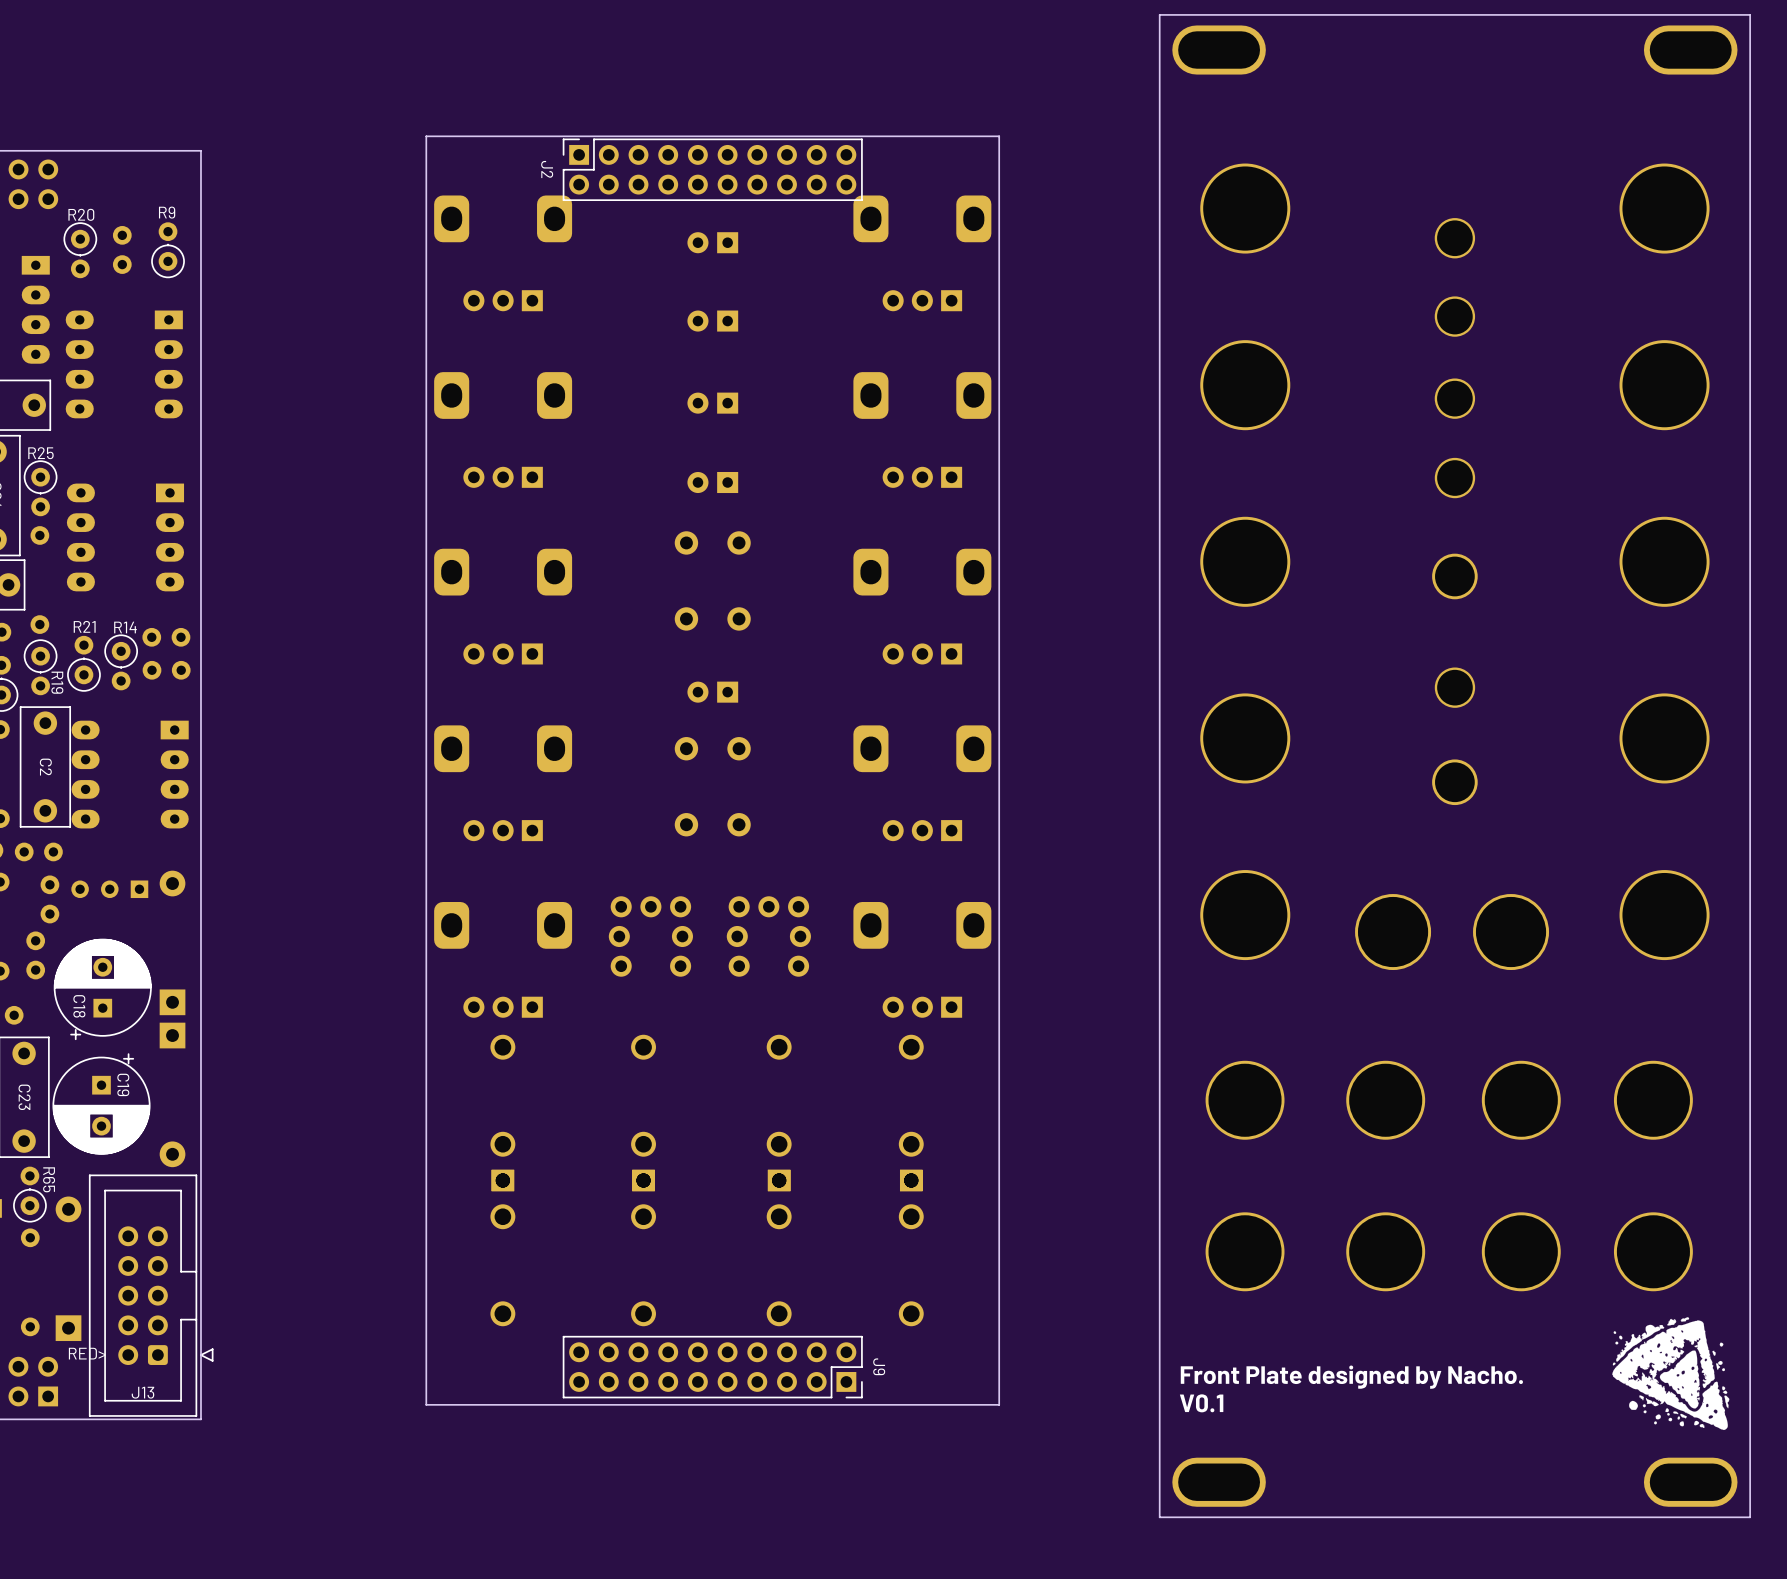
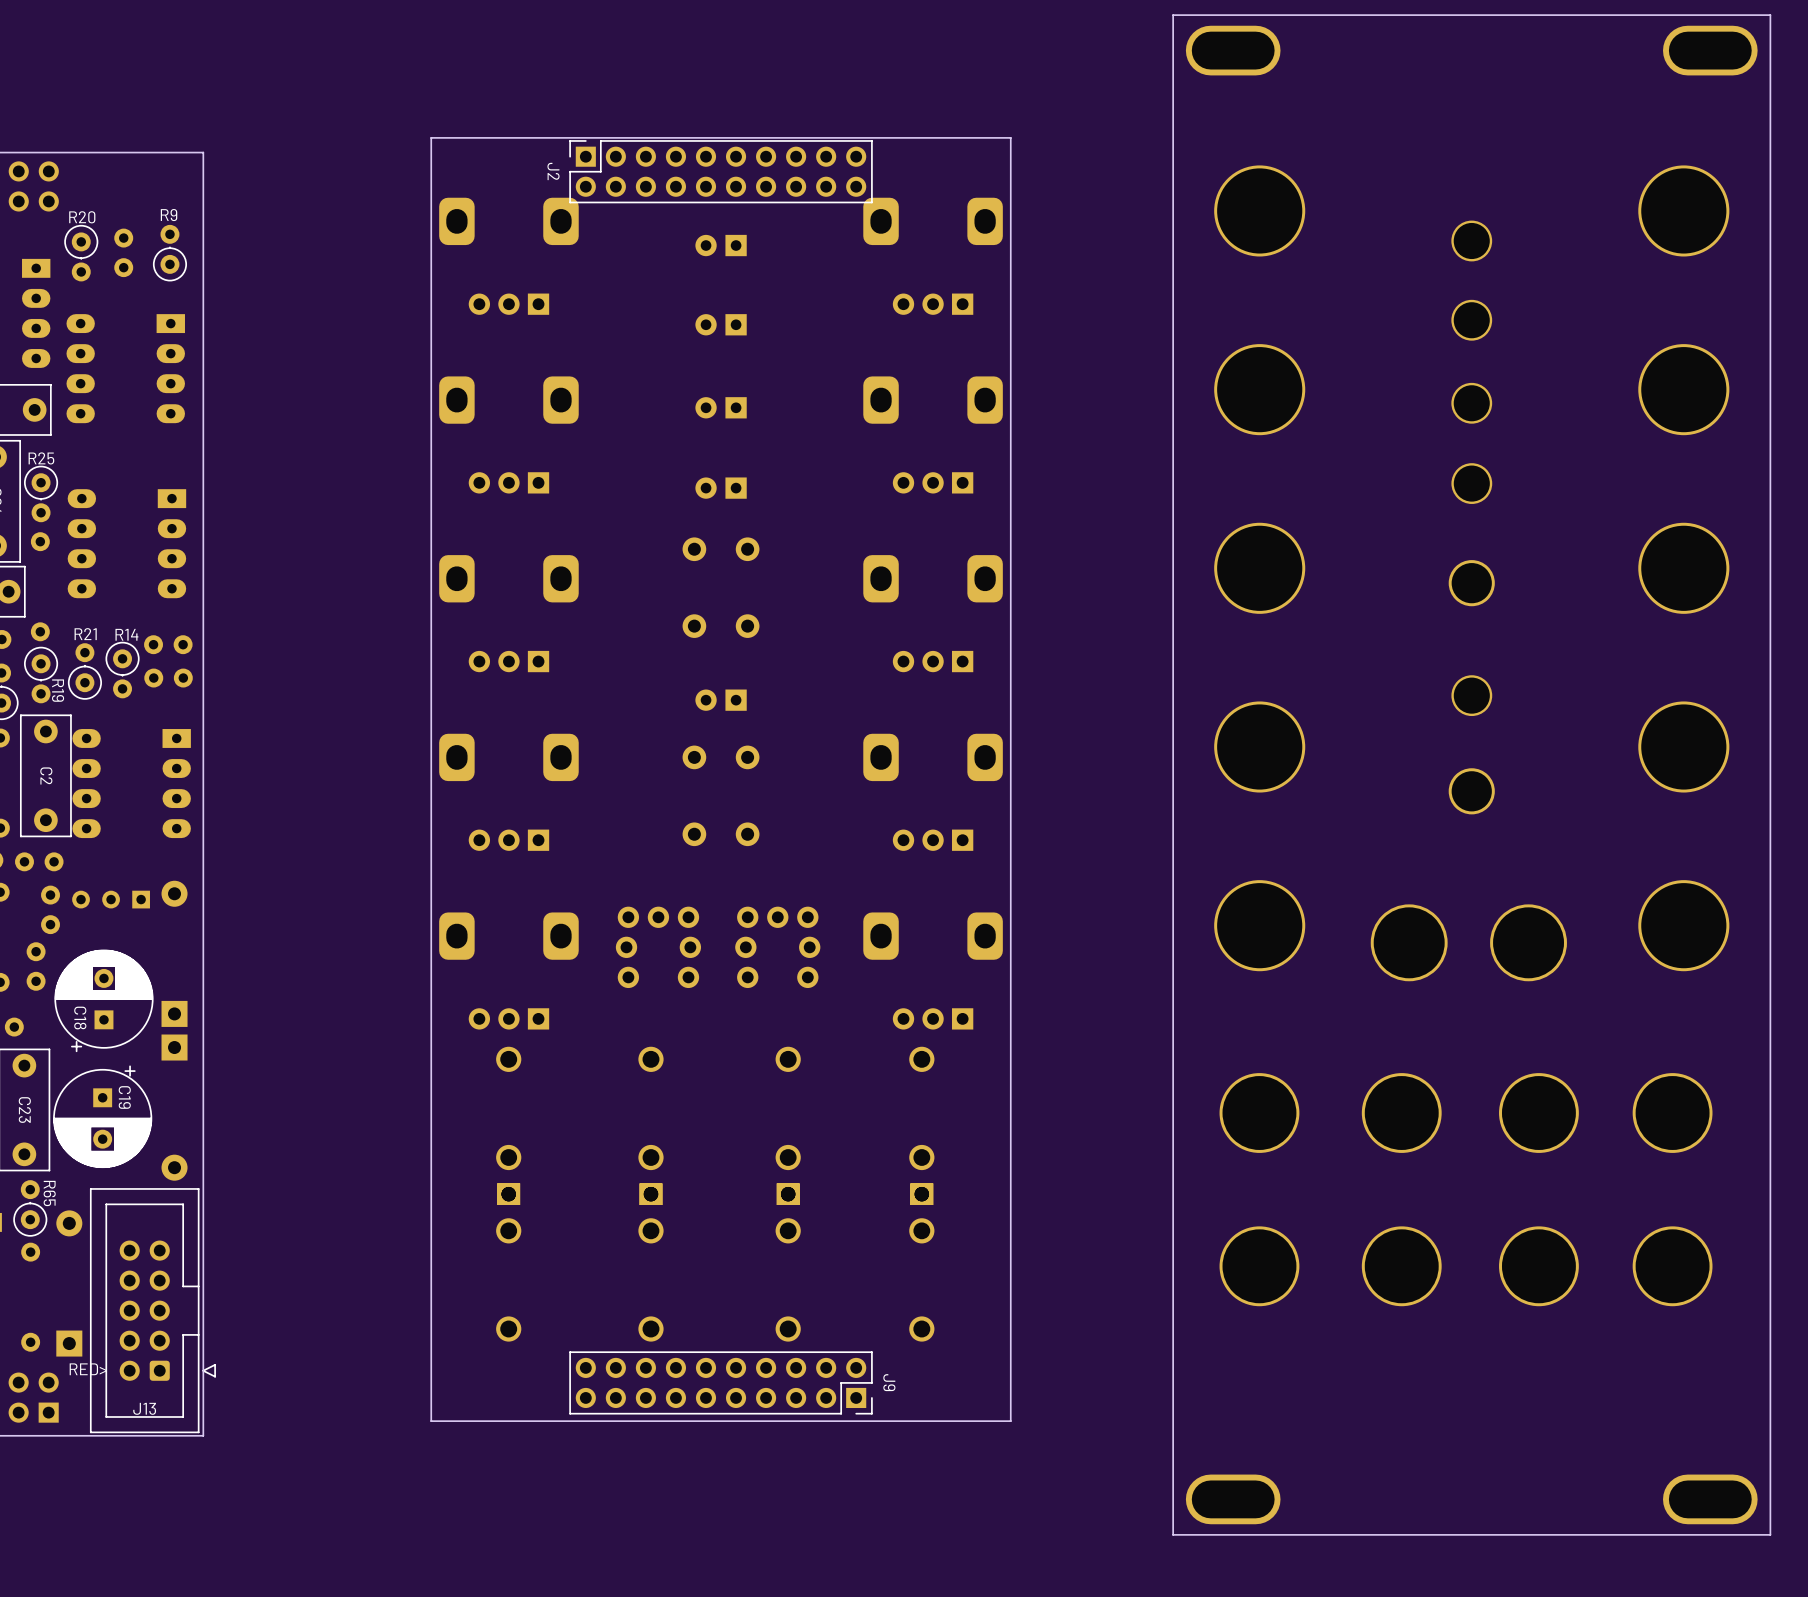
drawing: [1612, 1317, 1730, 1431] -> none
text: Front Plate designed by Nacho. (1351, 1377) -> none
text: V0.1 (1201, 1403) -> none

